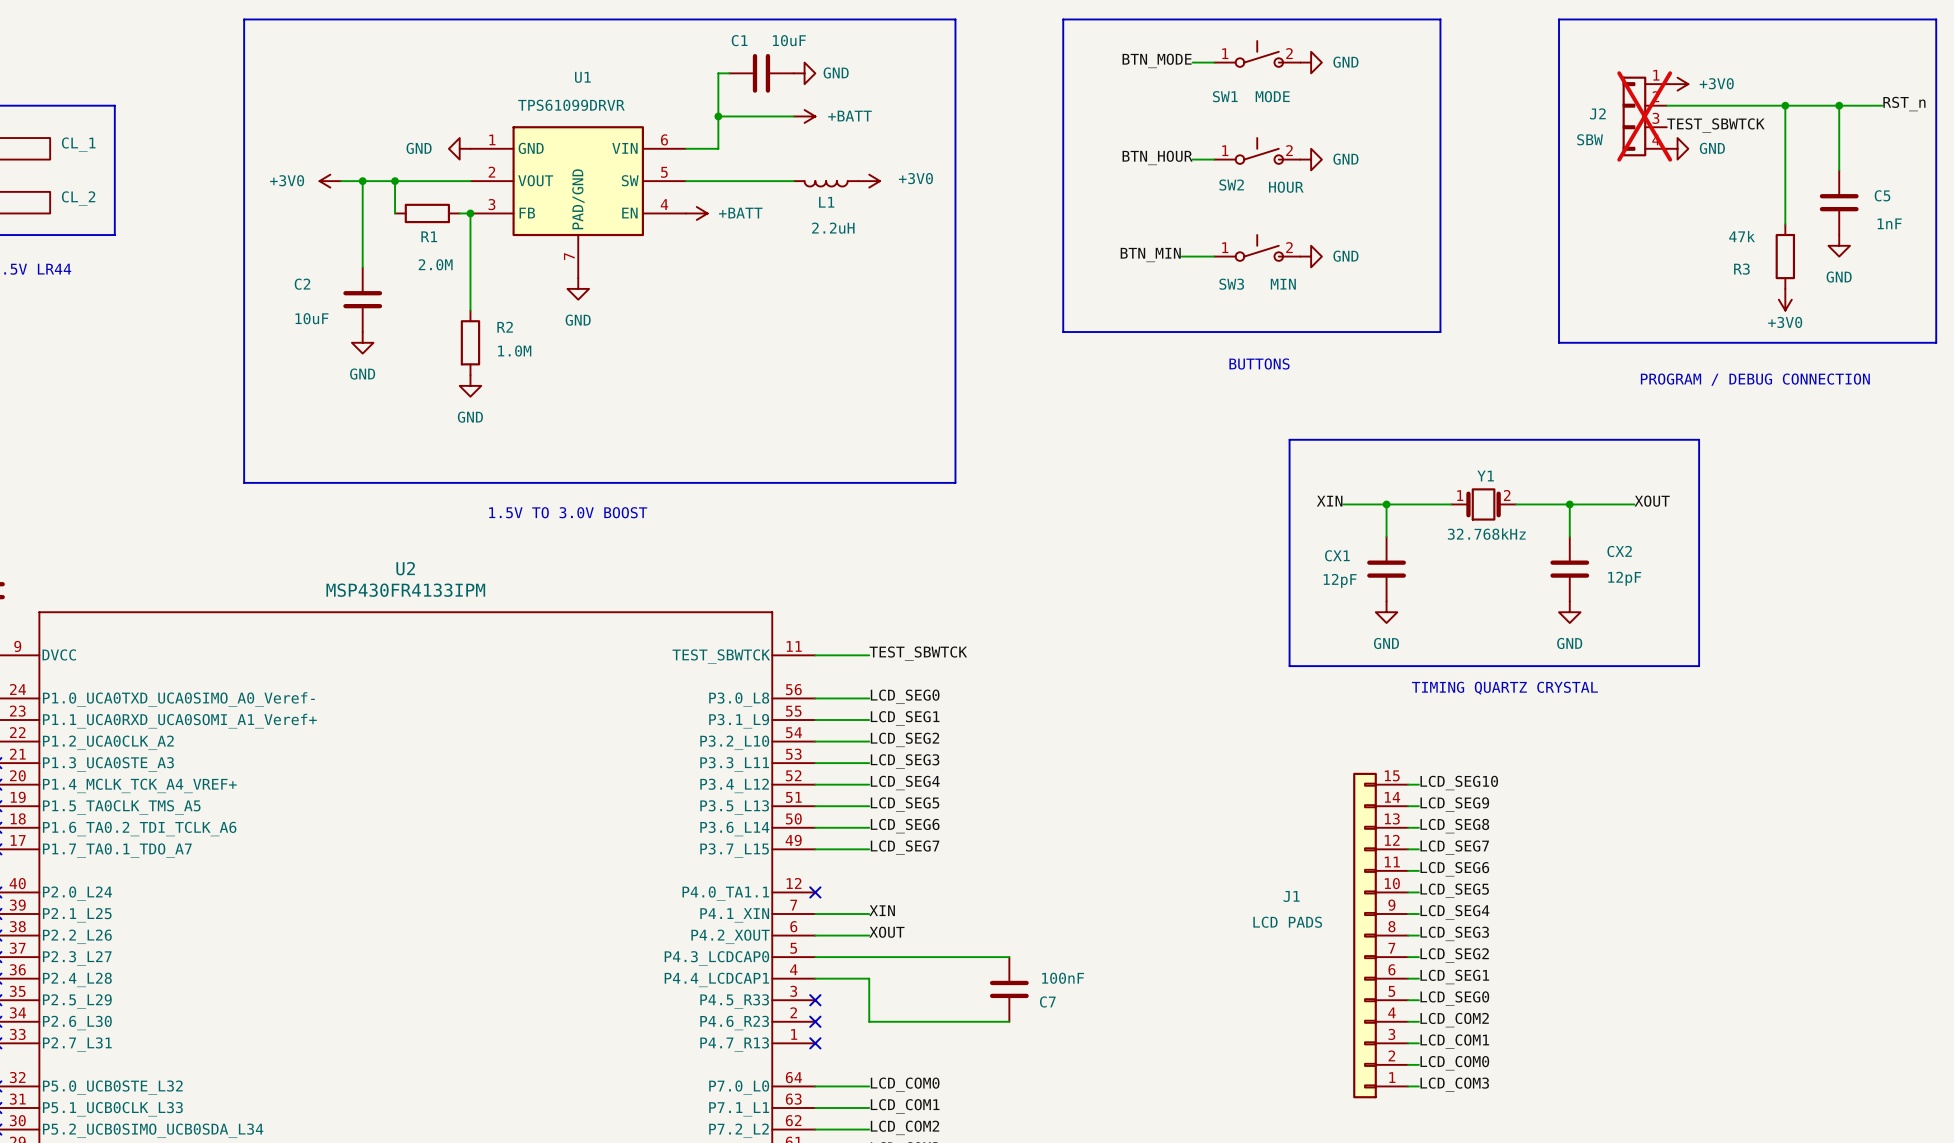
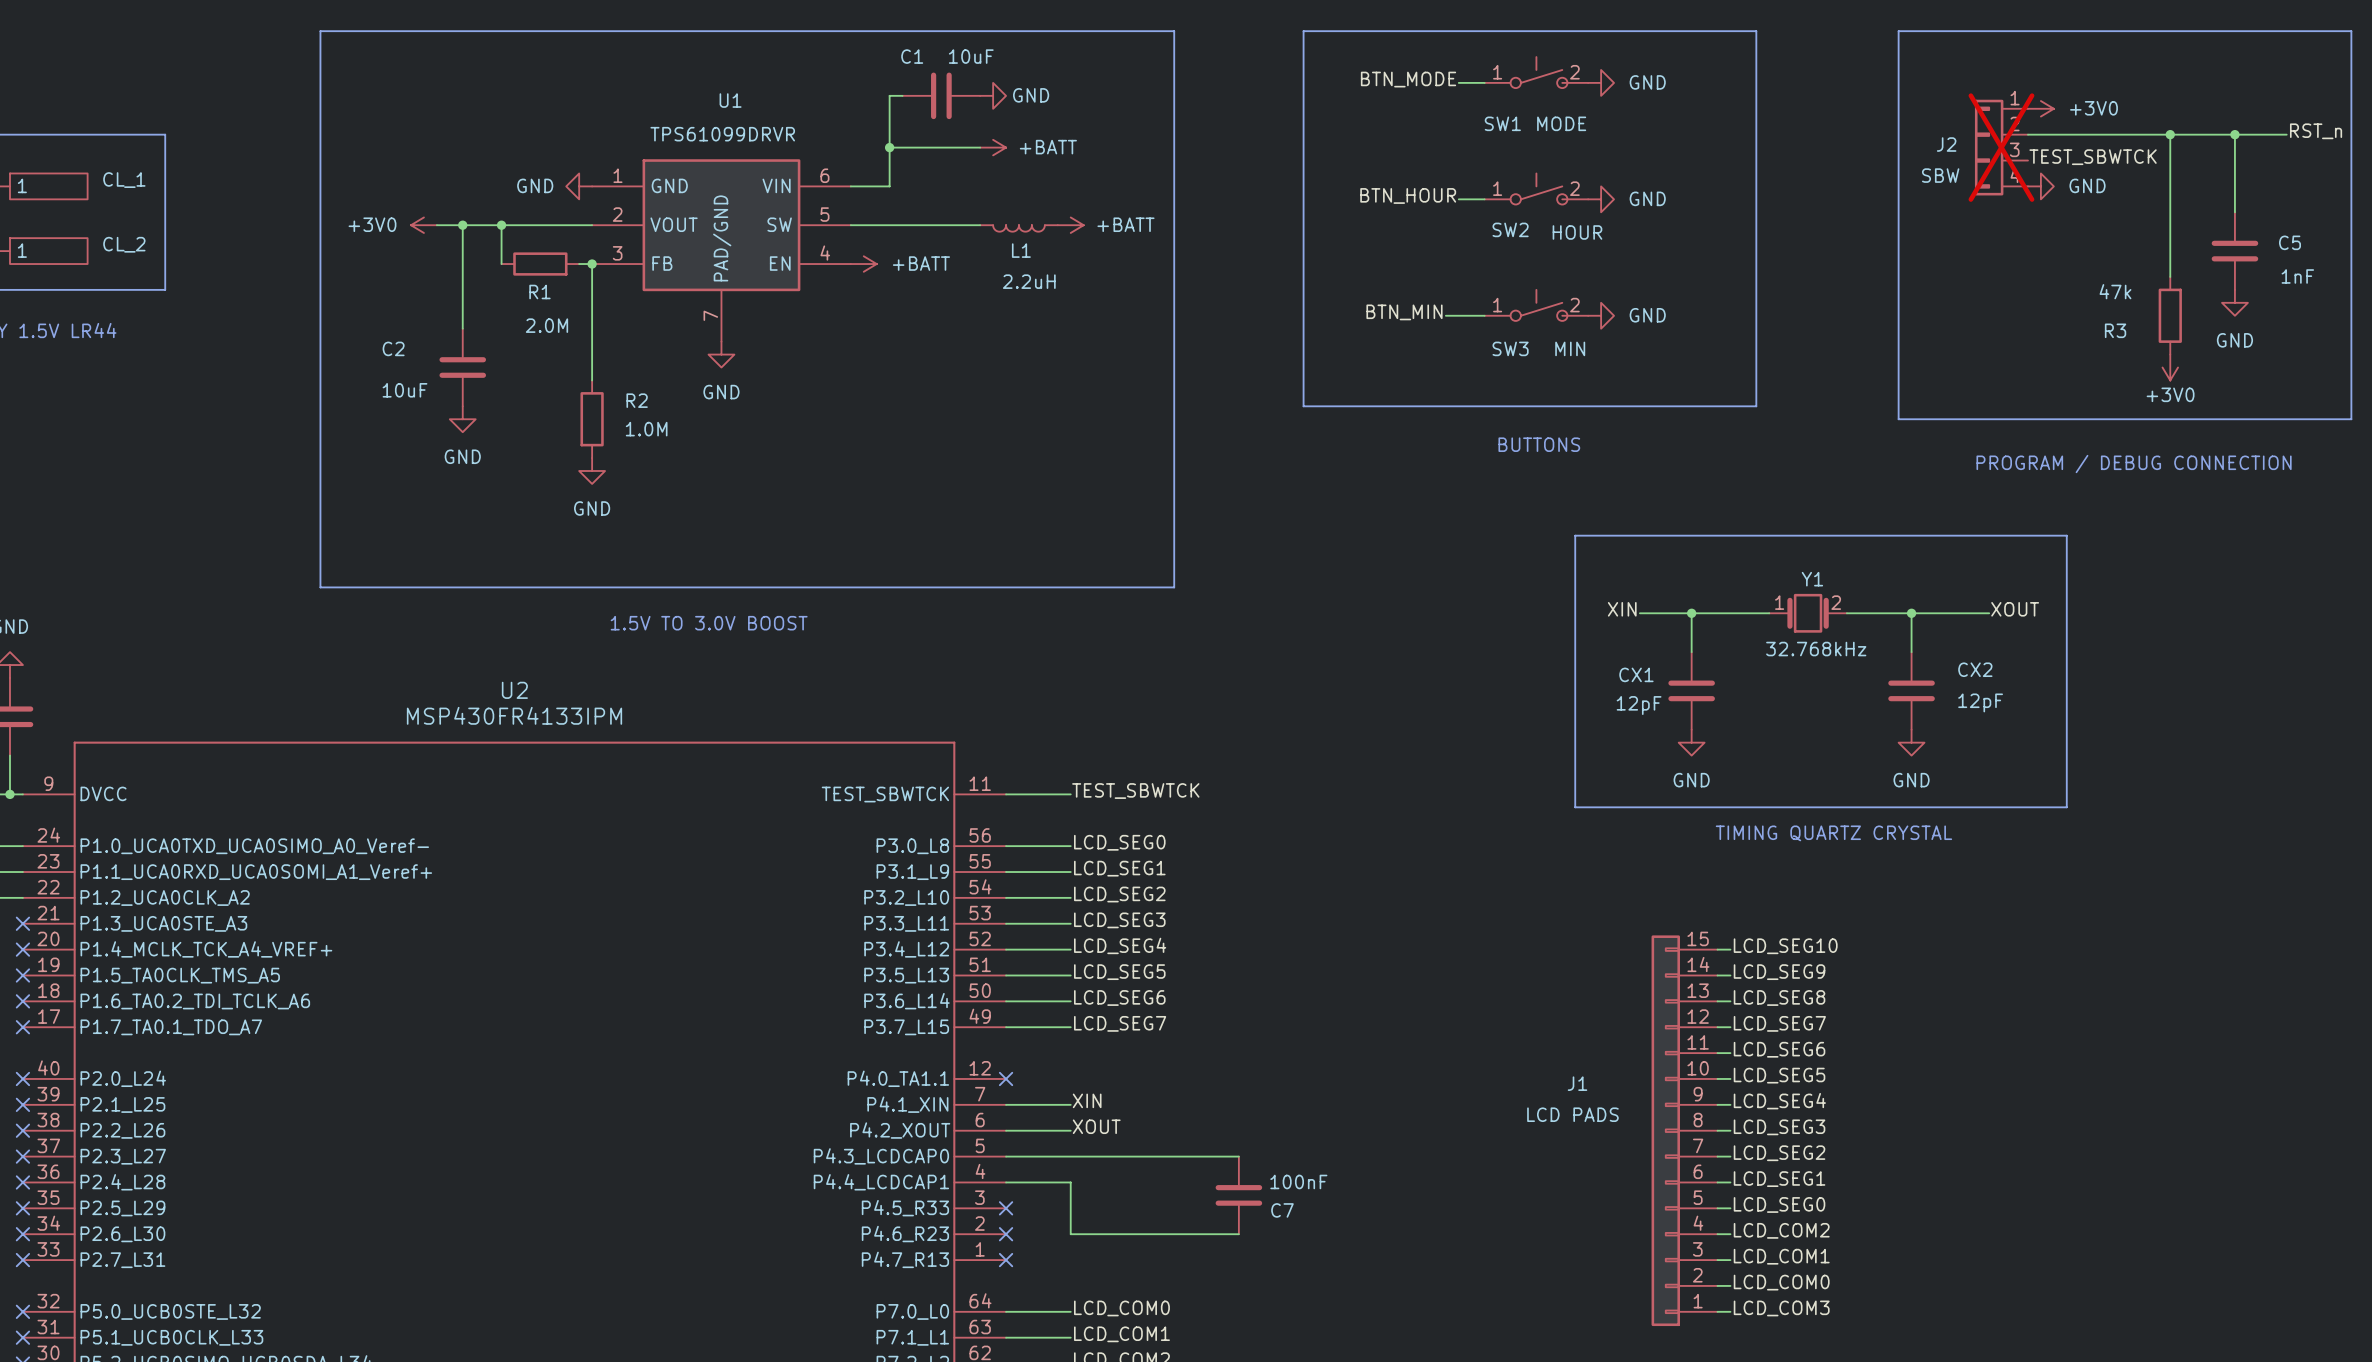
power symbol: +3V0 (869, 181) -> +BATT (1070, 225)

